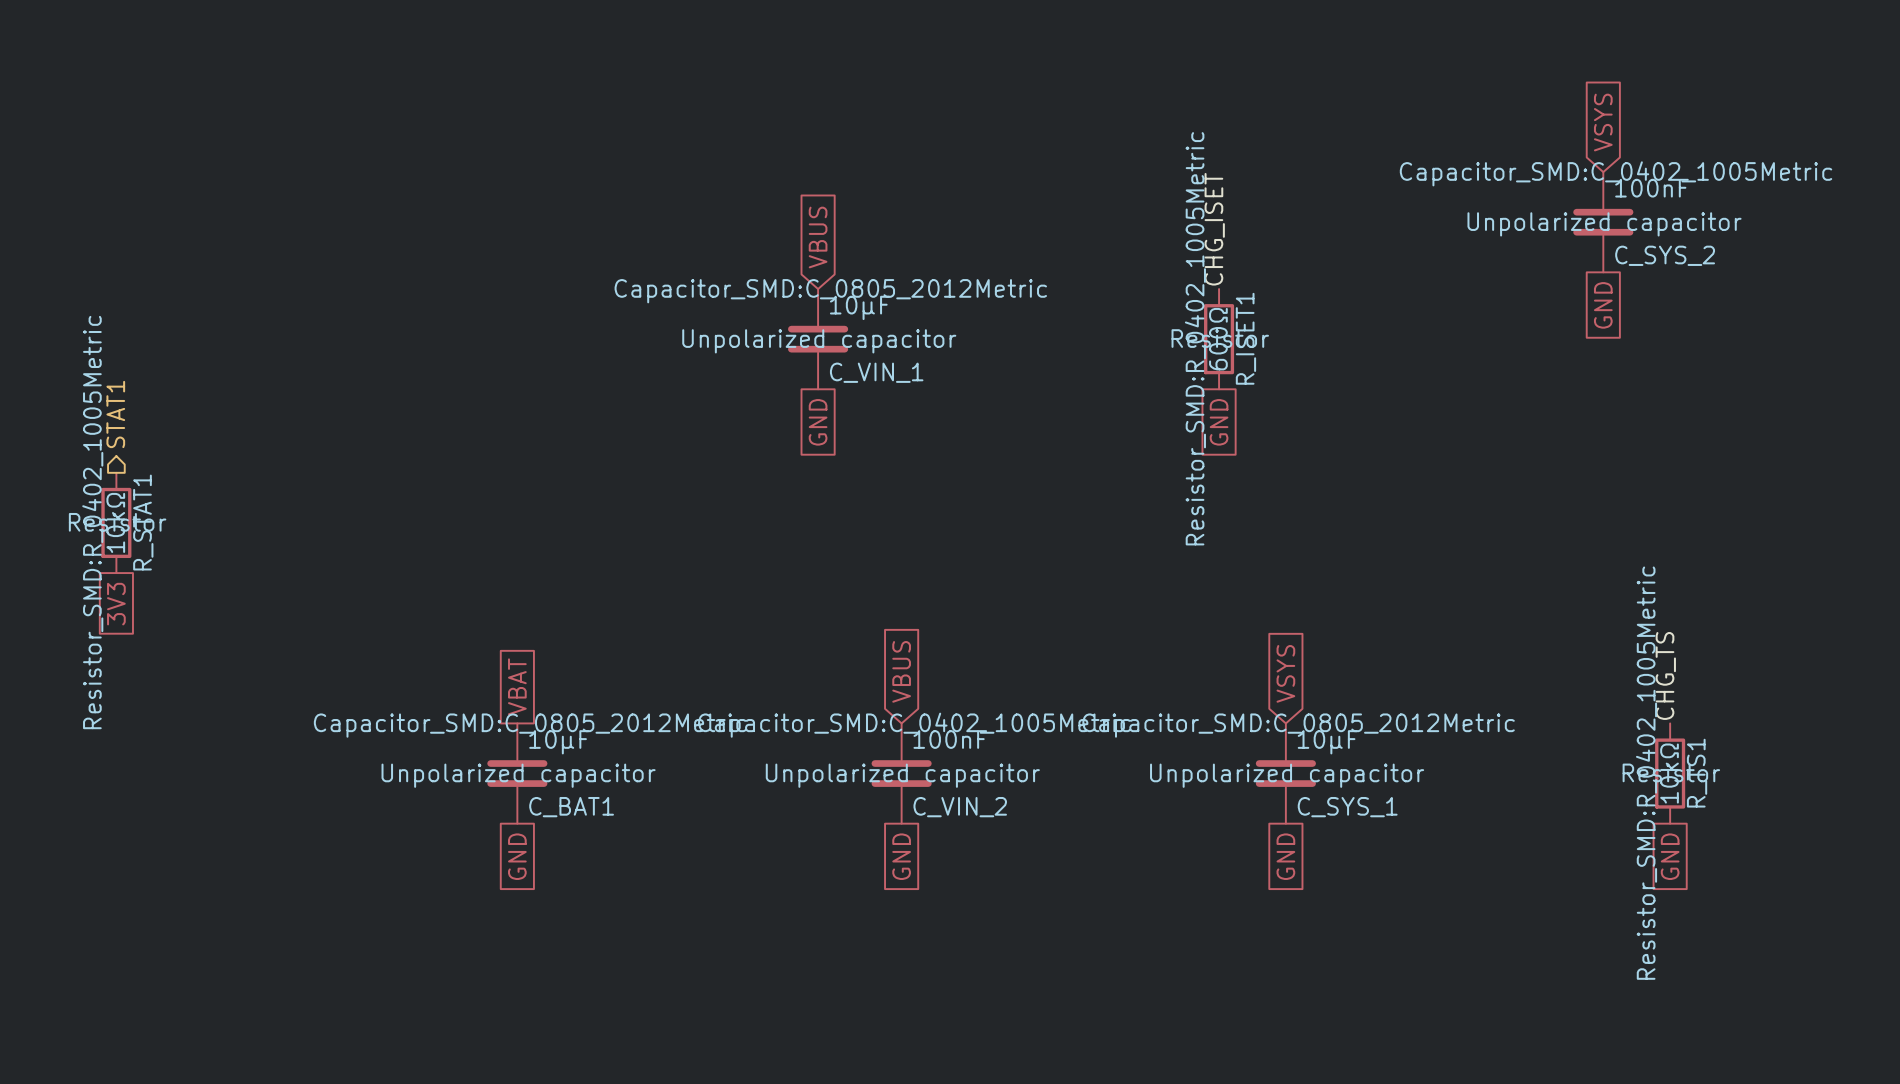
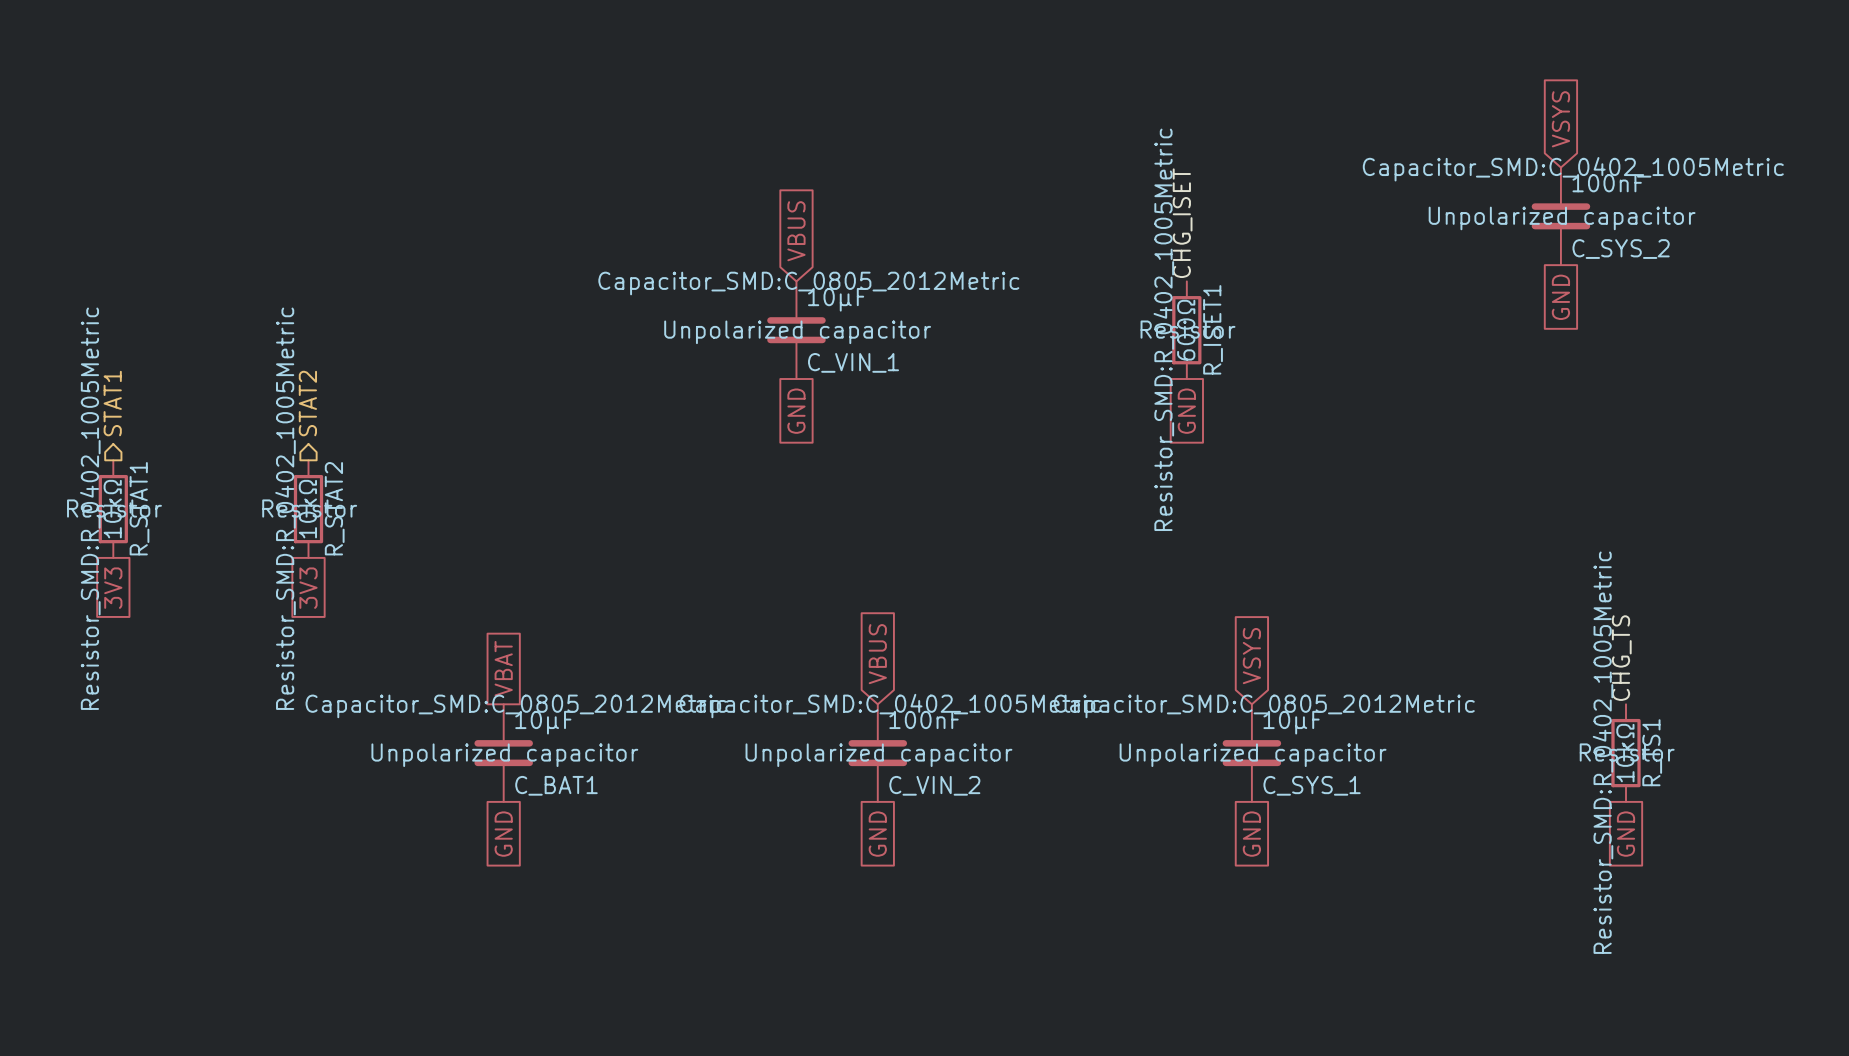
hierarchical label: none -> STAT2 (307, 403)
R_STAT2: none -> 10kΩ (308, 509)
global label: none -> 3V3 (308, 588)

